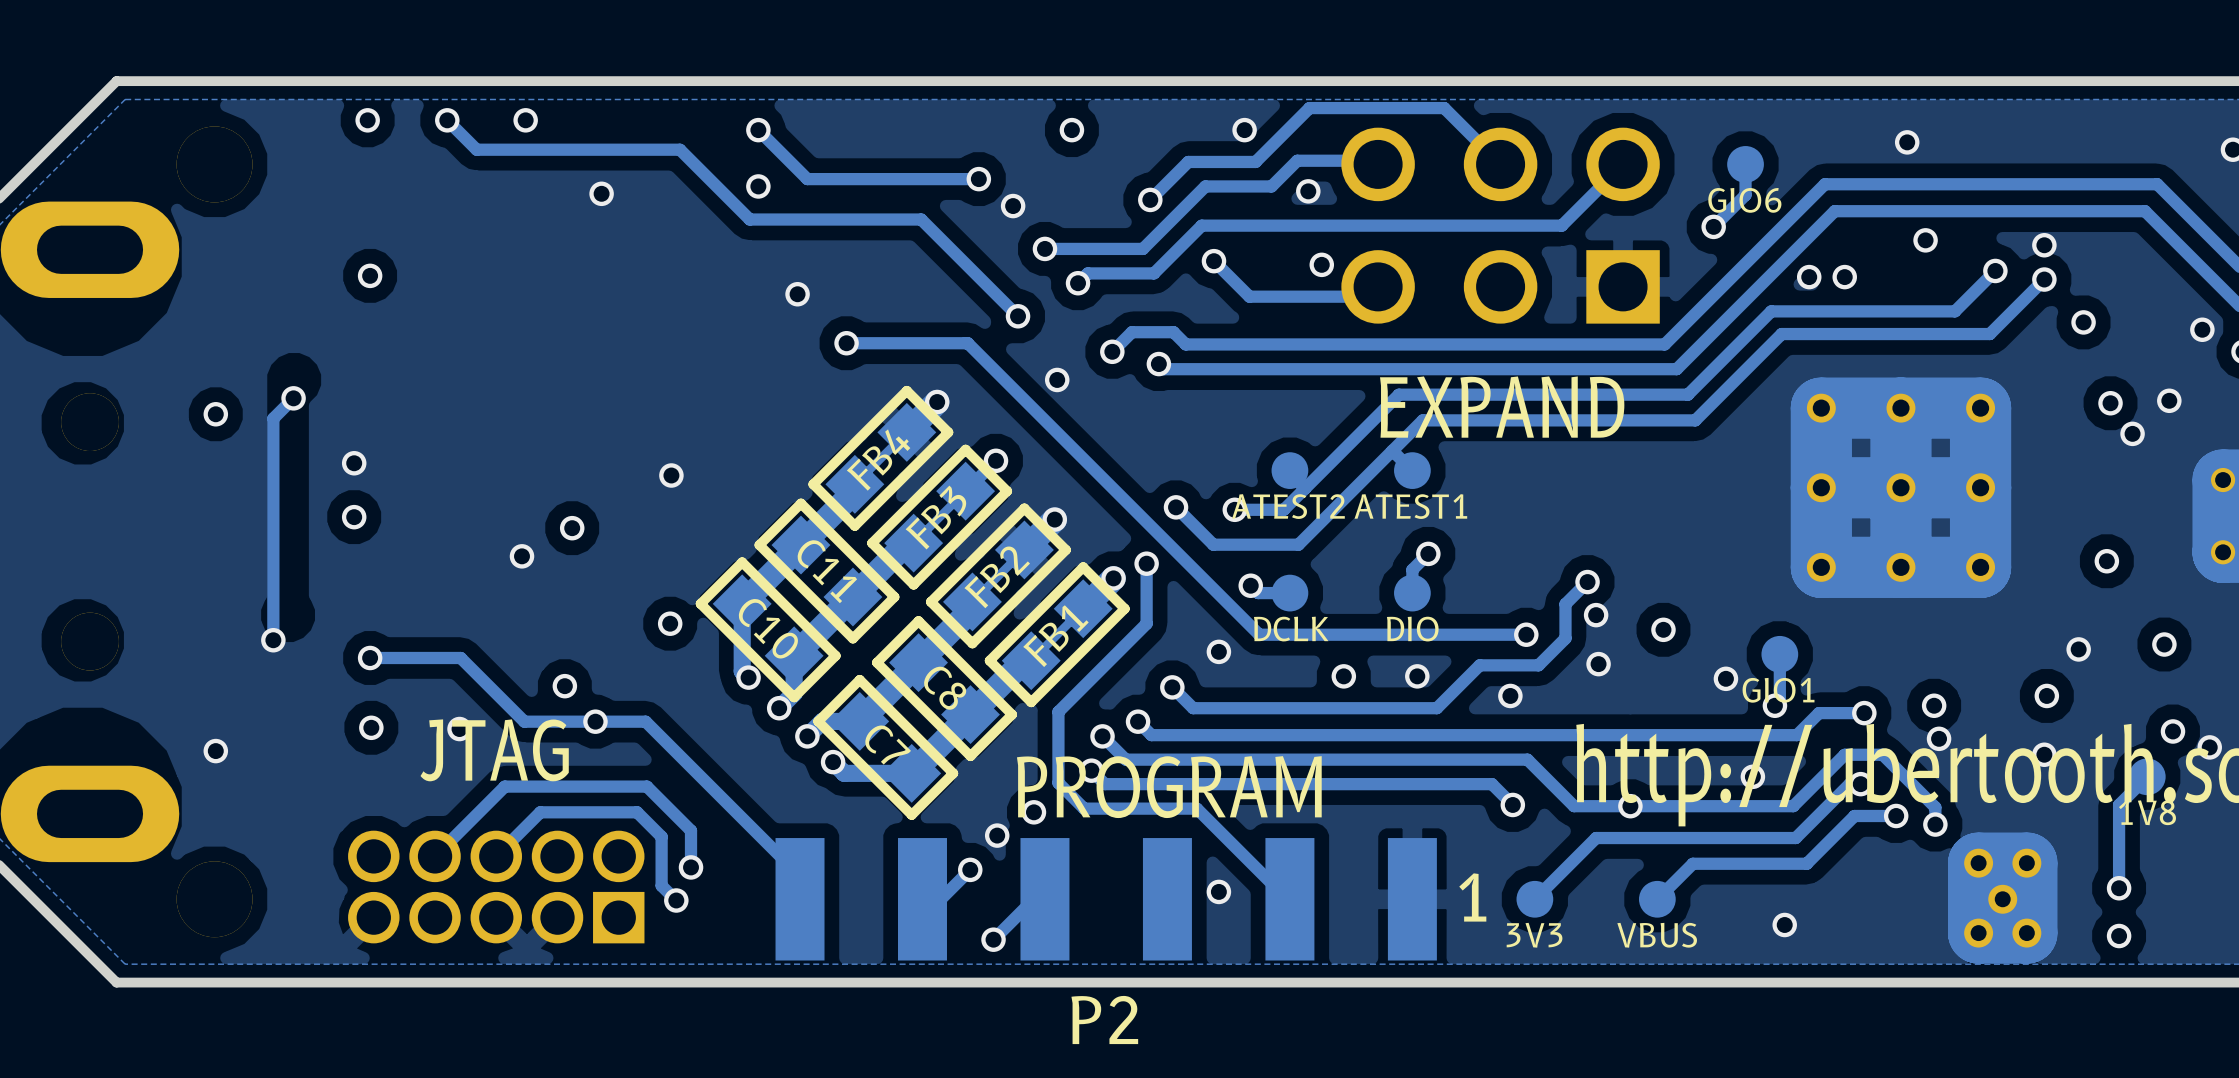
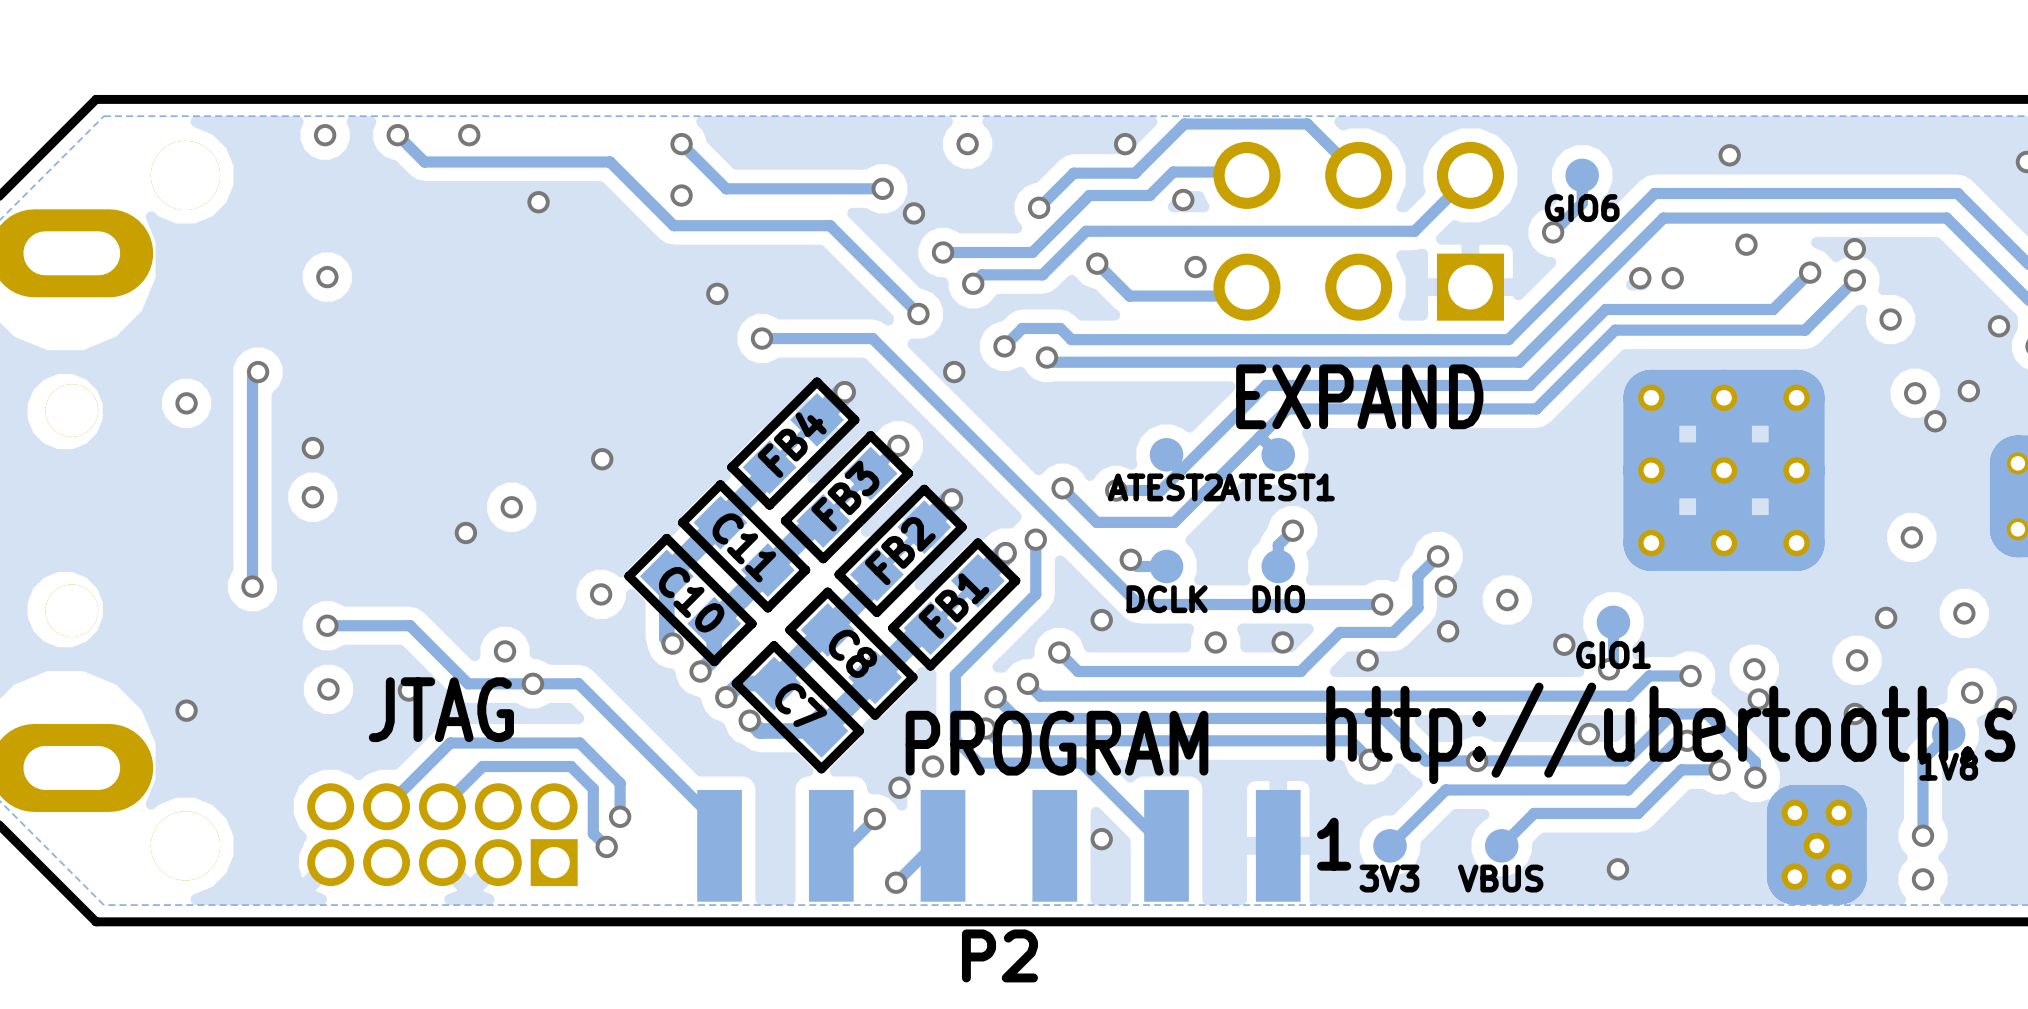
track: none -> (258, 372) (252, 377) (252, 586)
track: (293, 398) (273, 418) (273, 640) -> none
via position: (293, 398) -> (258, 372)
via position: (273, 640) -> (252, 586)

